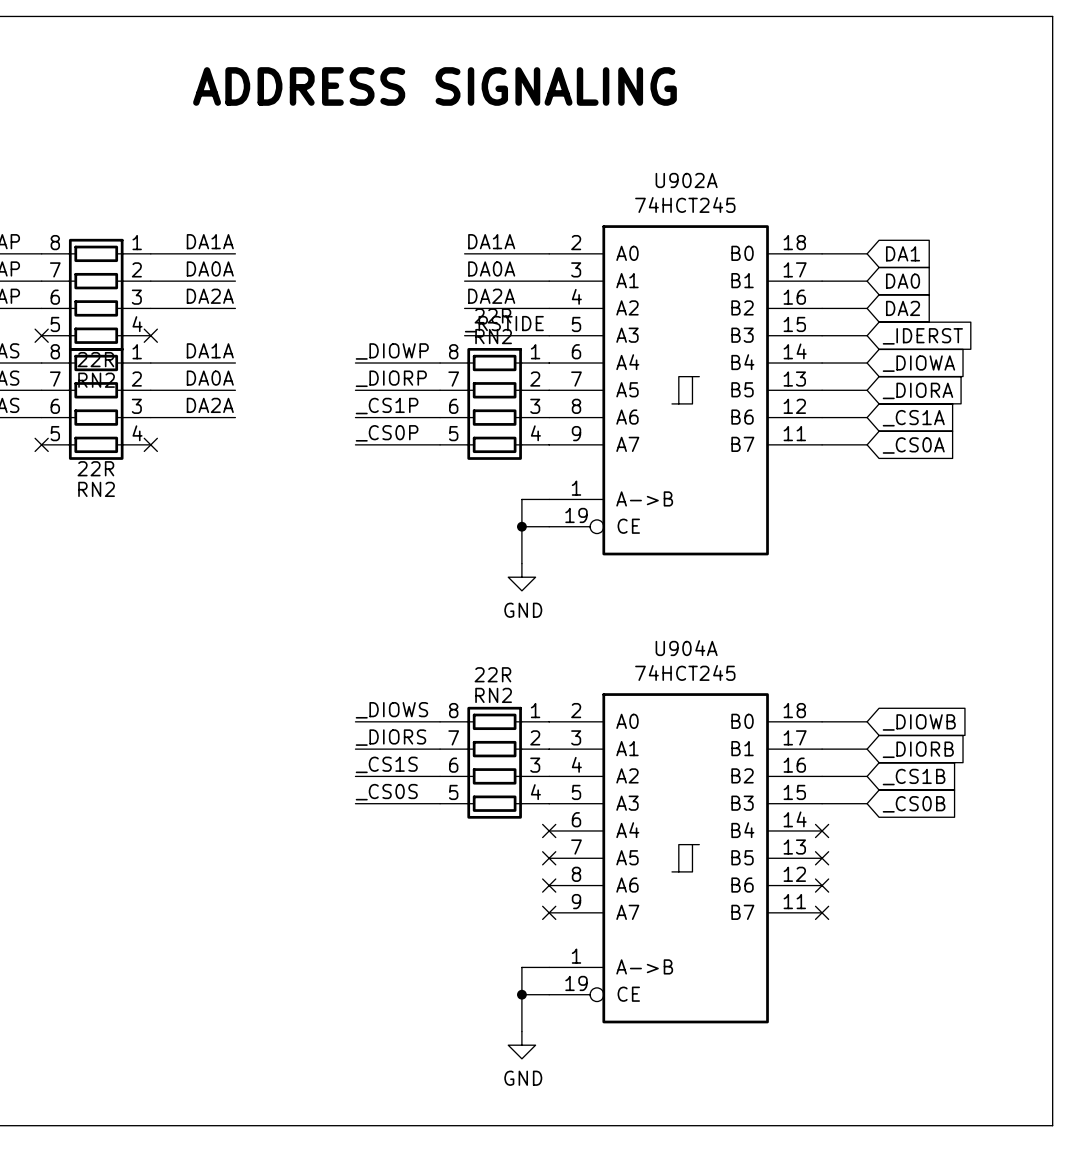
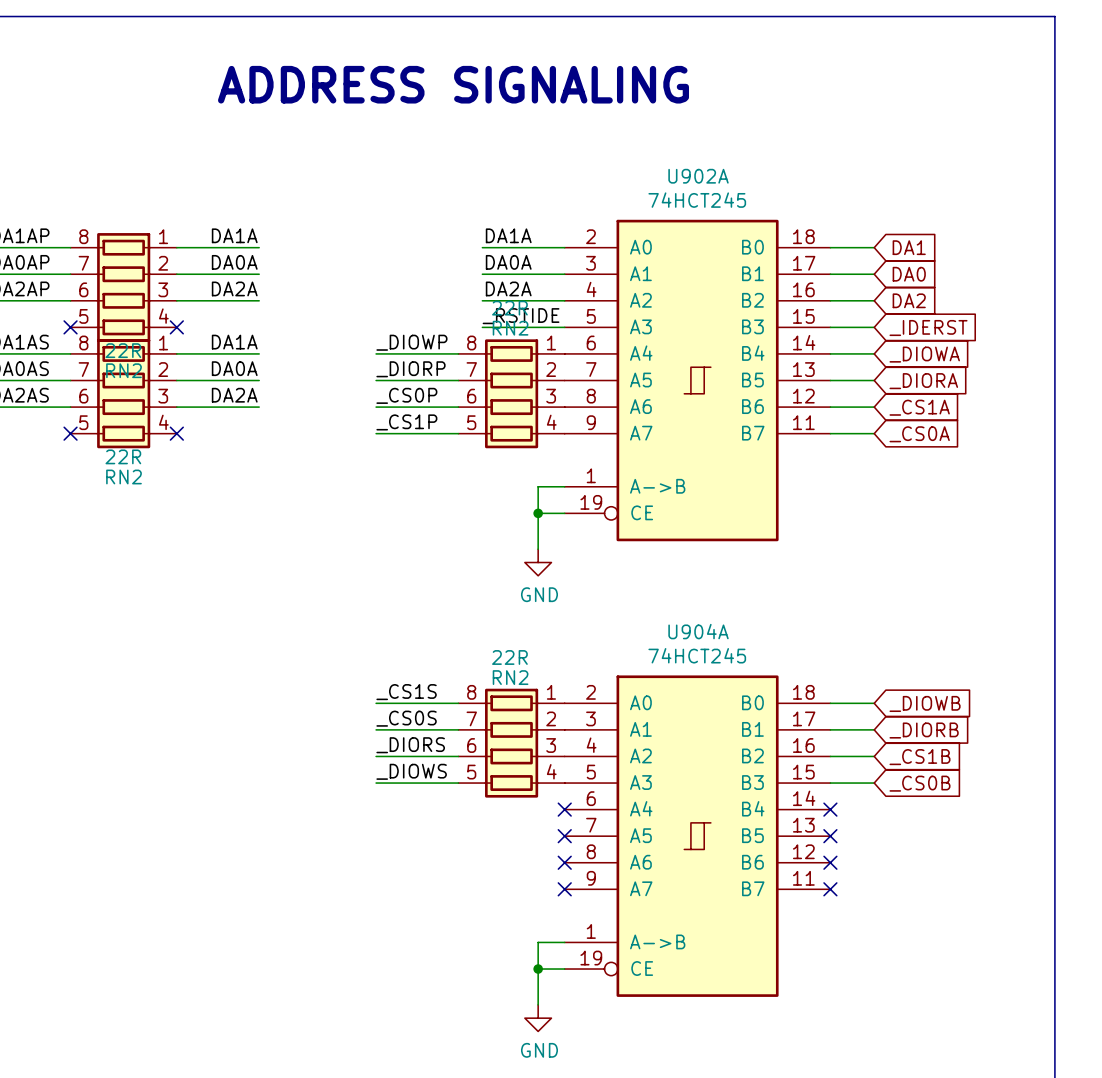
label: _CS1P (387, 406) -> _CS0P (406, 395)
label: _CS0P (387, 433) -> _CS1P (406, 422)
label: _DIOWS (391, 710) -> _CS1S (406, 692)
label: _DIORS (390, 737) -> _CS0S (406, 718)
label: _CS1S (386, 764) -> _DIORS (410, 745)
label: _CS0S (386, 792) -> _DIOWS (411, 771)

